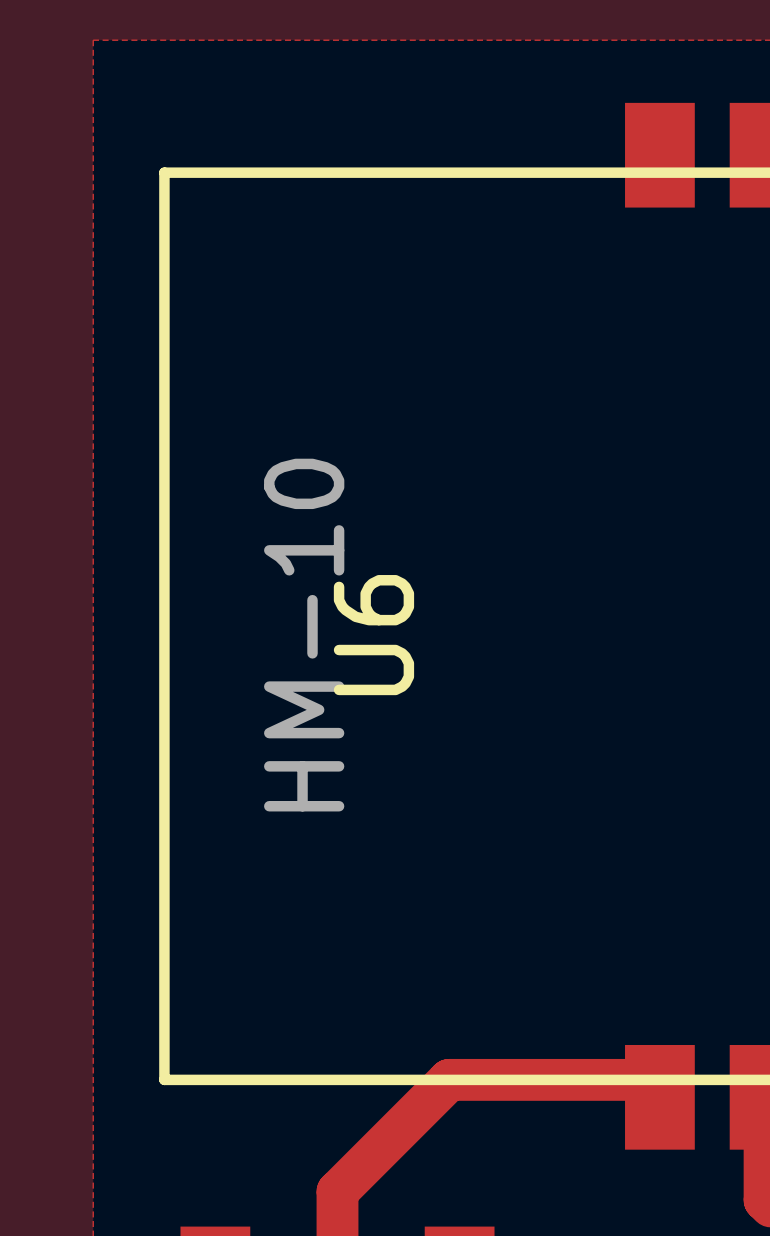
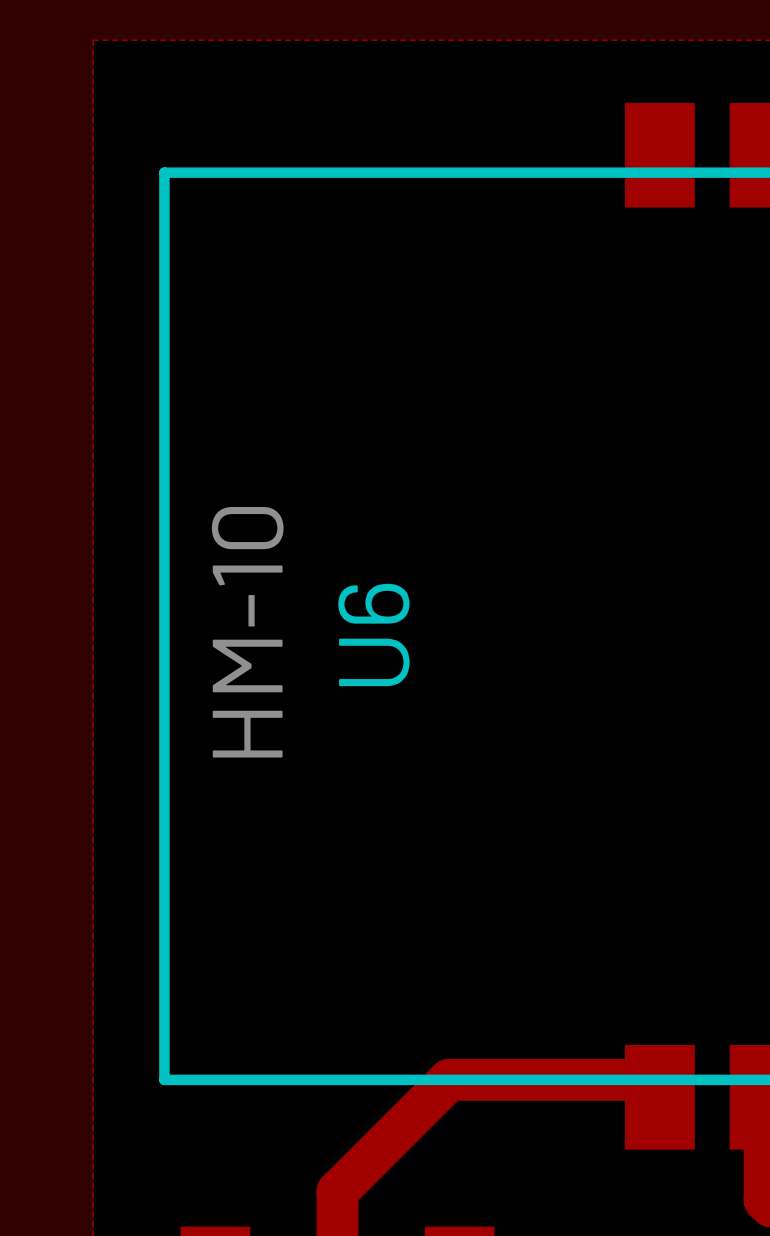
U6 value position: HM-10 (304, 635) -> HM-10 (247, 632)

